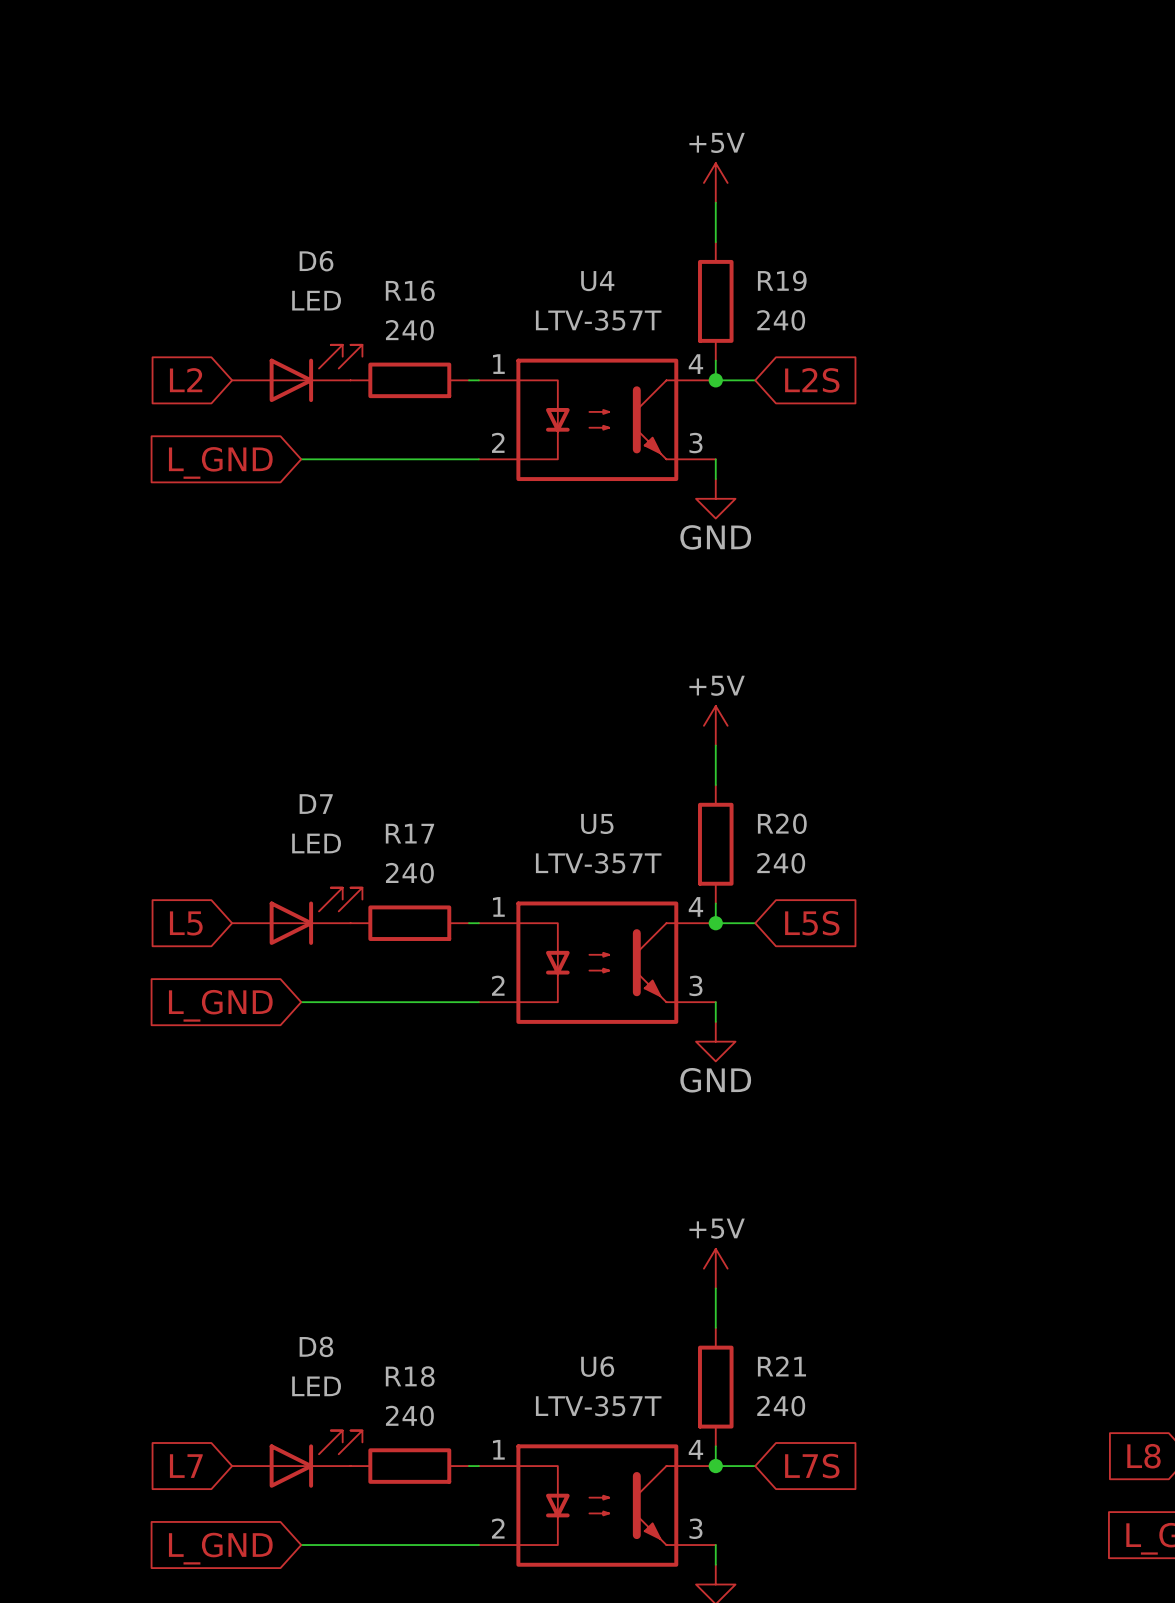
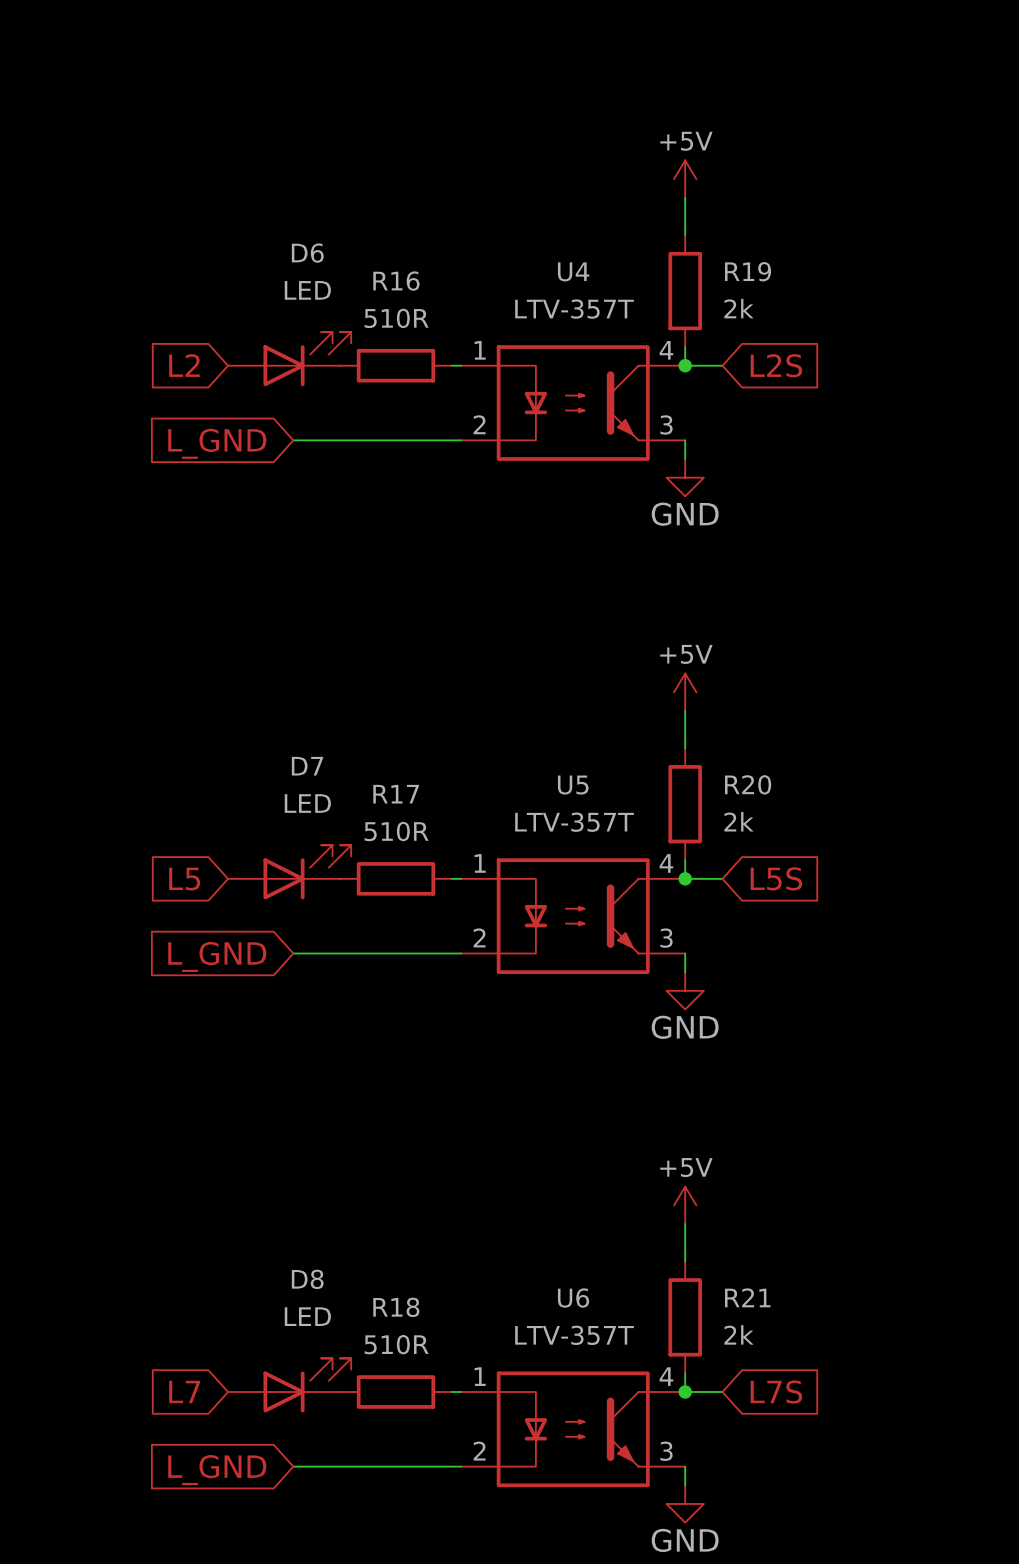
R19 value: 240 (781, 320) -> 2k (738, 308)
R16 value: 240 (409, 330) -> 510R (396, 318)
R20 value: 240 (781, 863) -> 2k (738, 821)
R17 value: 240 (409, 873) -> 510R (396, 831)
R21 value: 240 (781, 1406) -> 2k (738, 1334)
R18 value: 240 (409, 1415) -> 510R (396, 1344)

